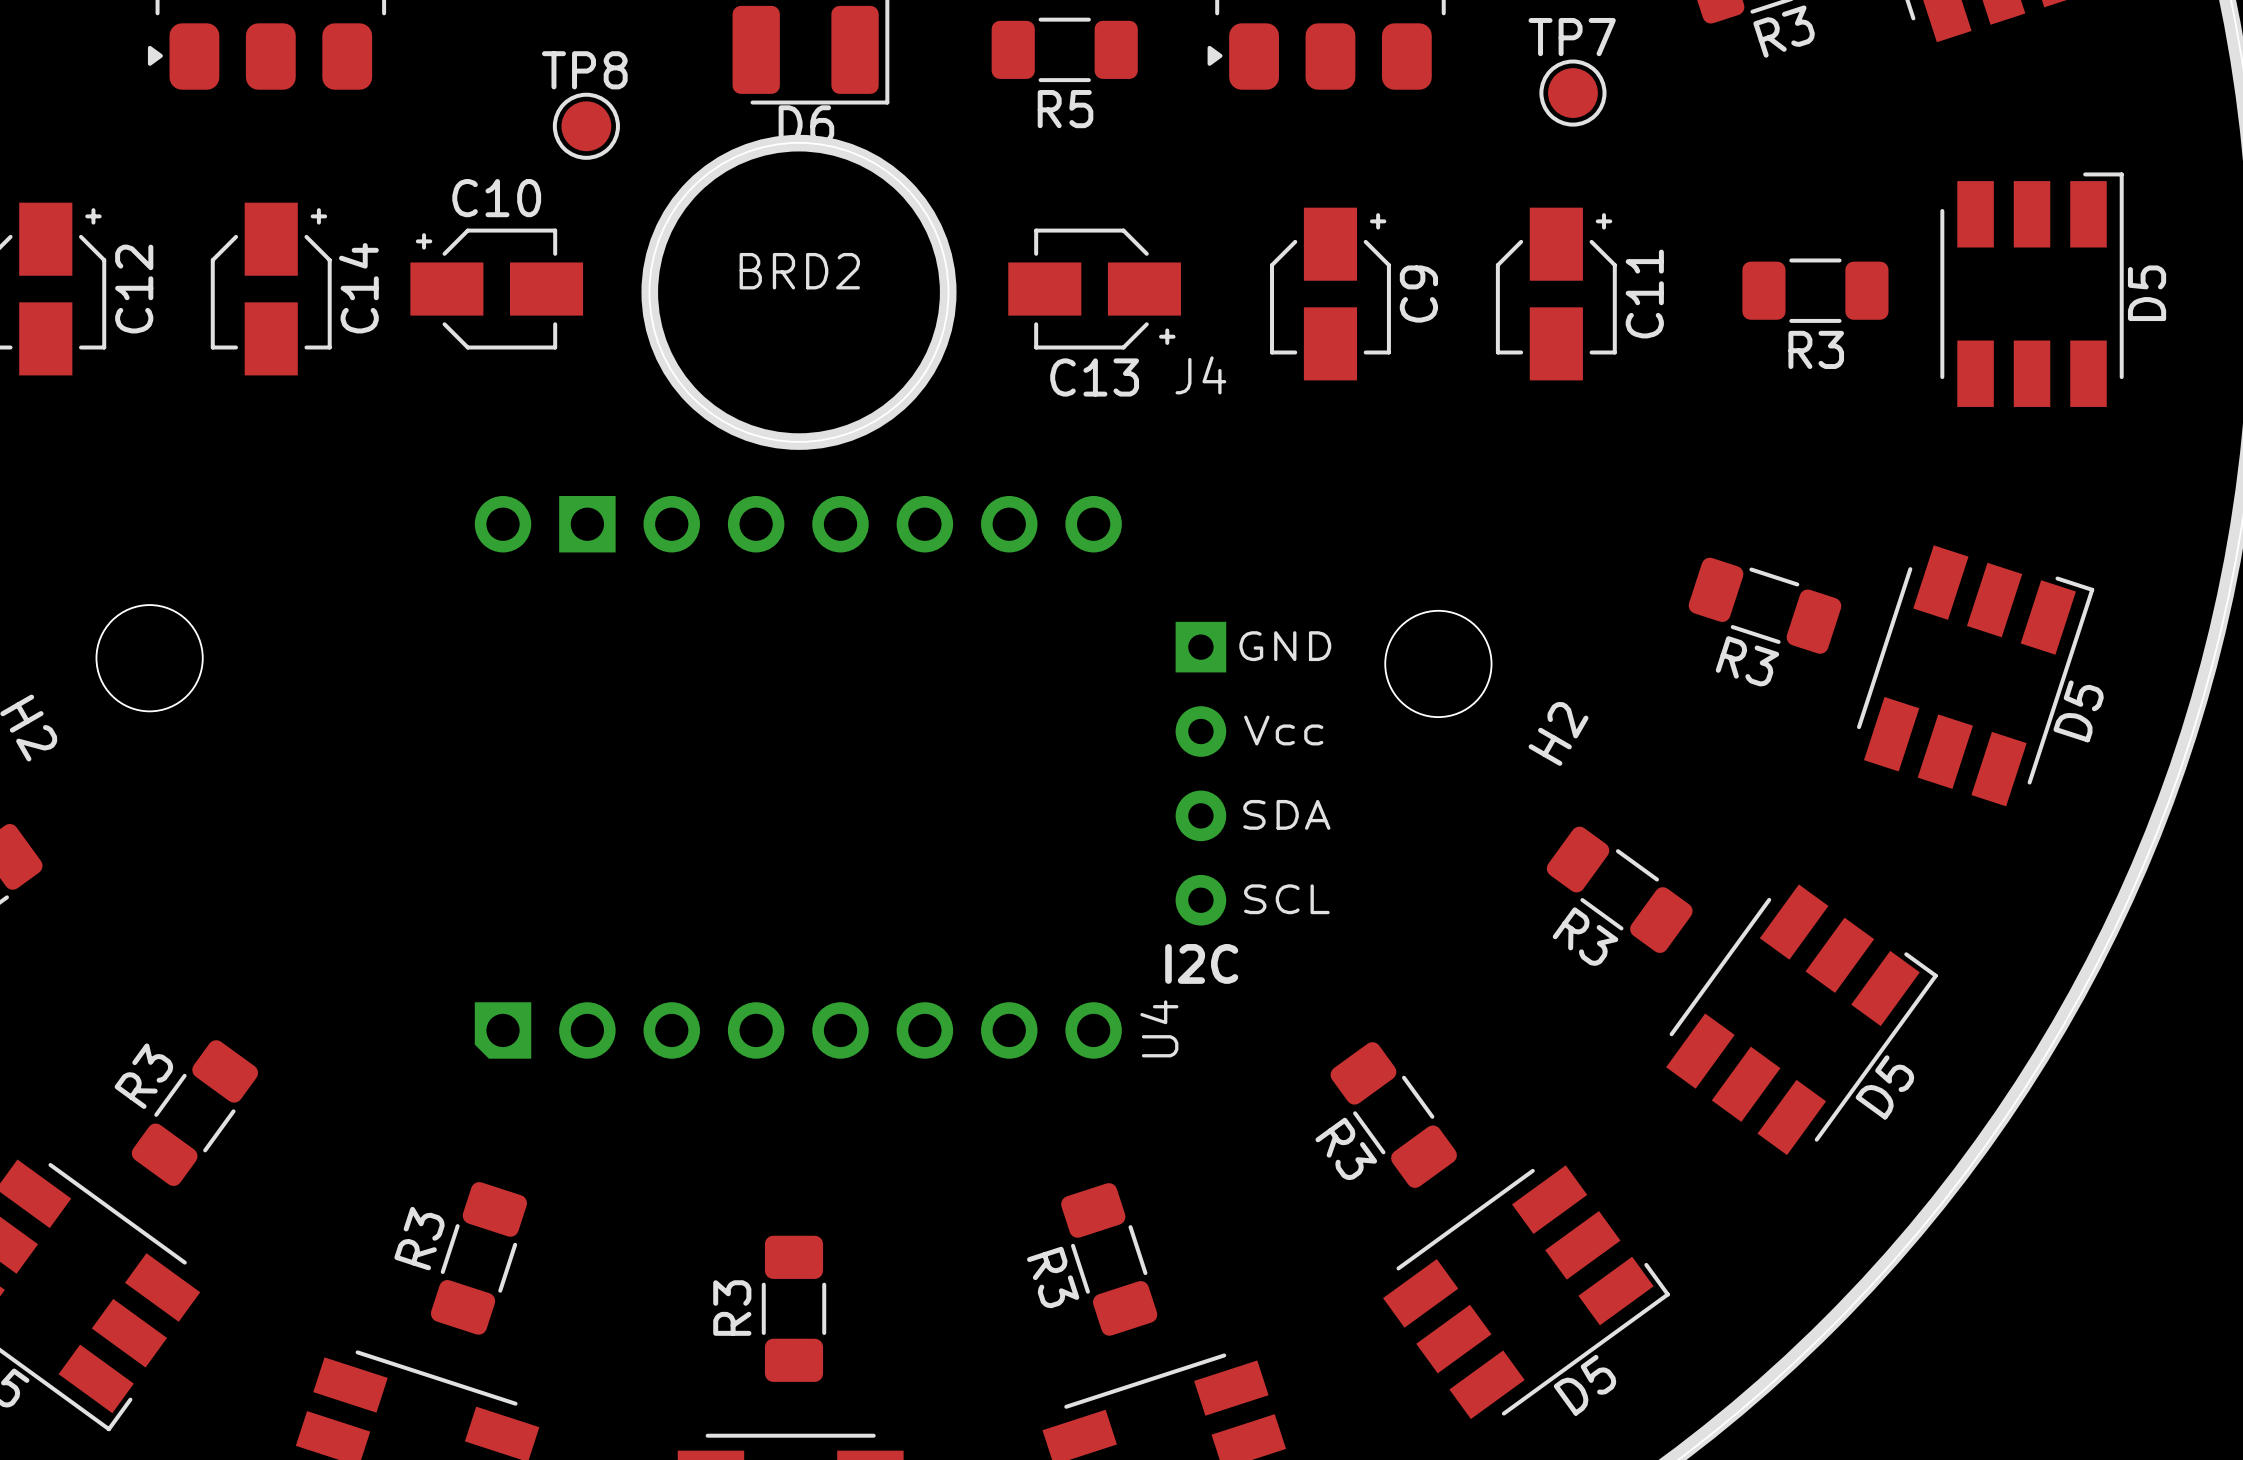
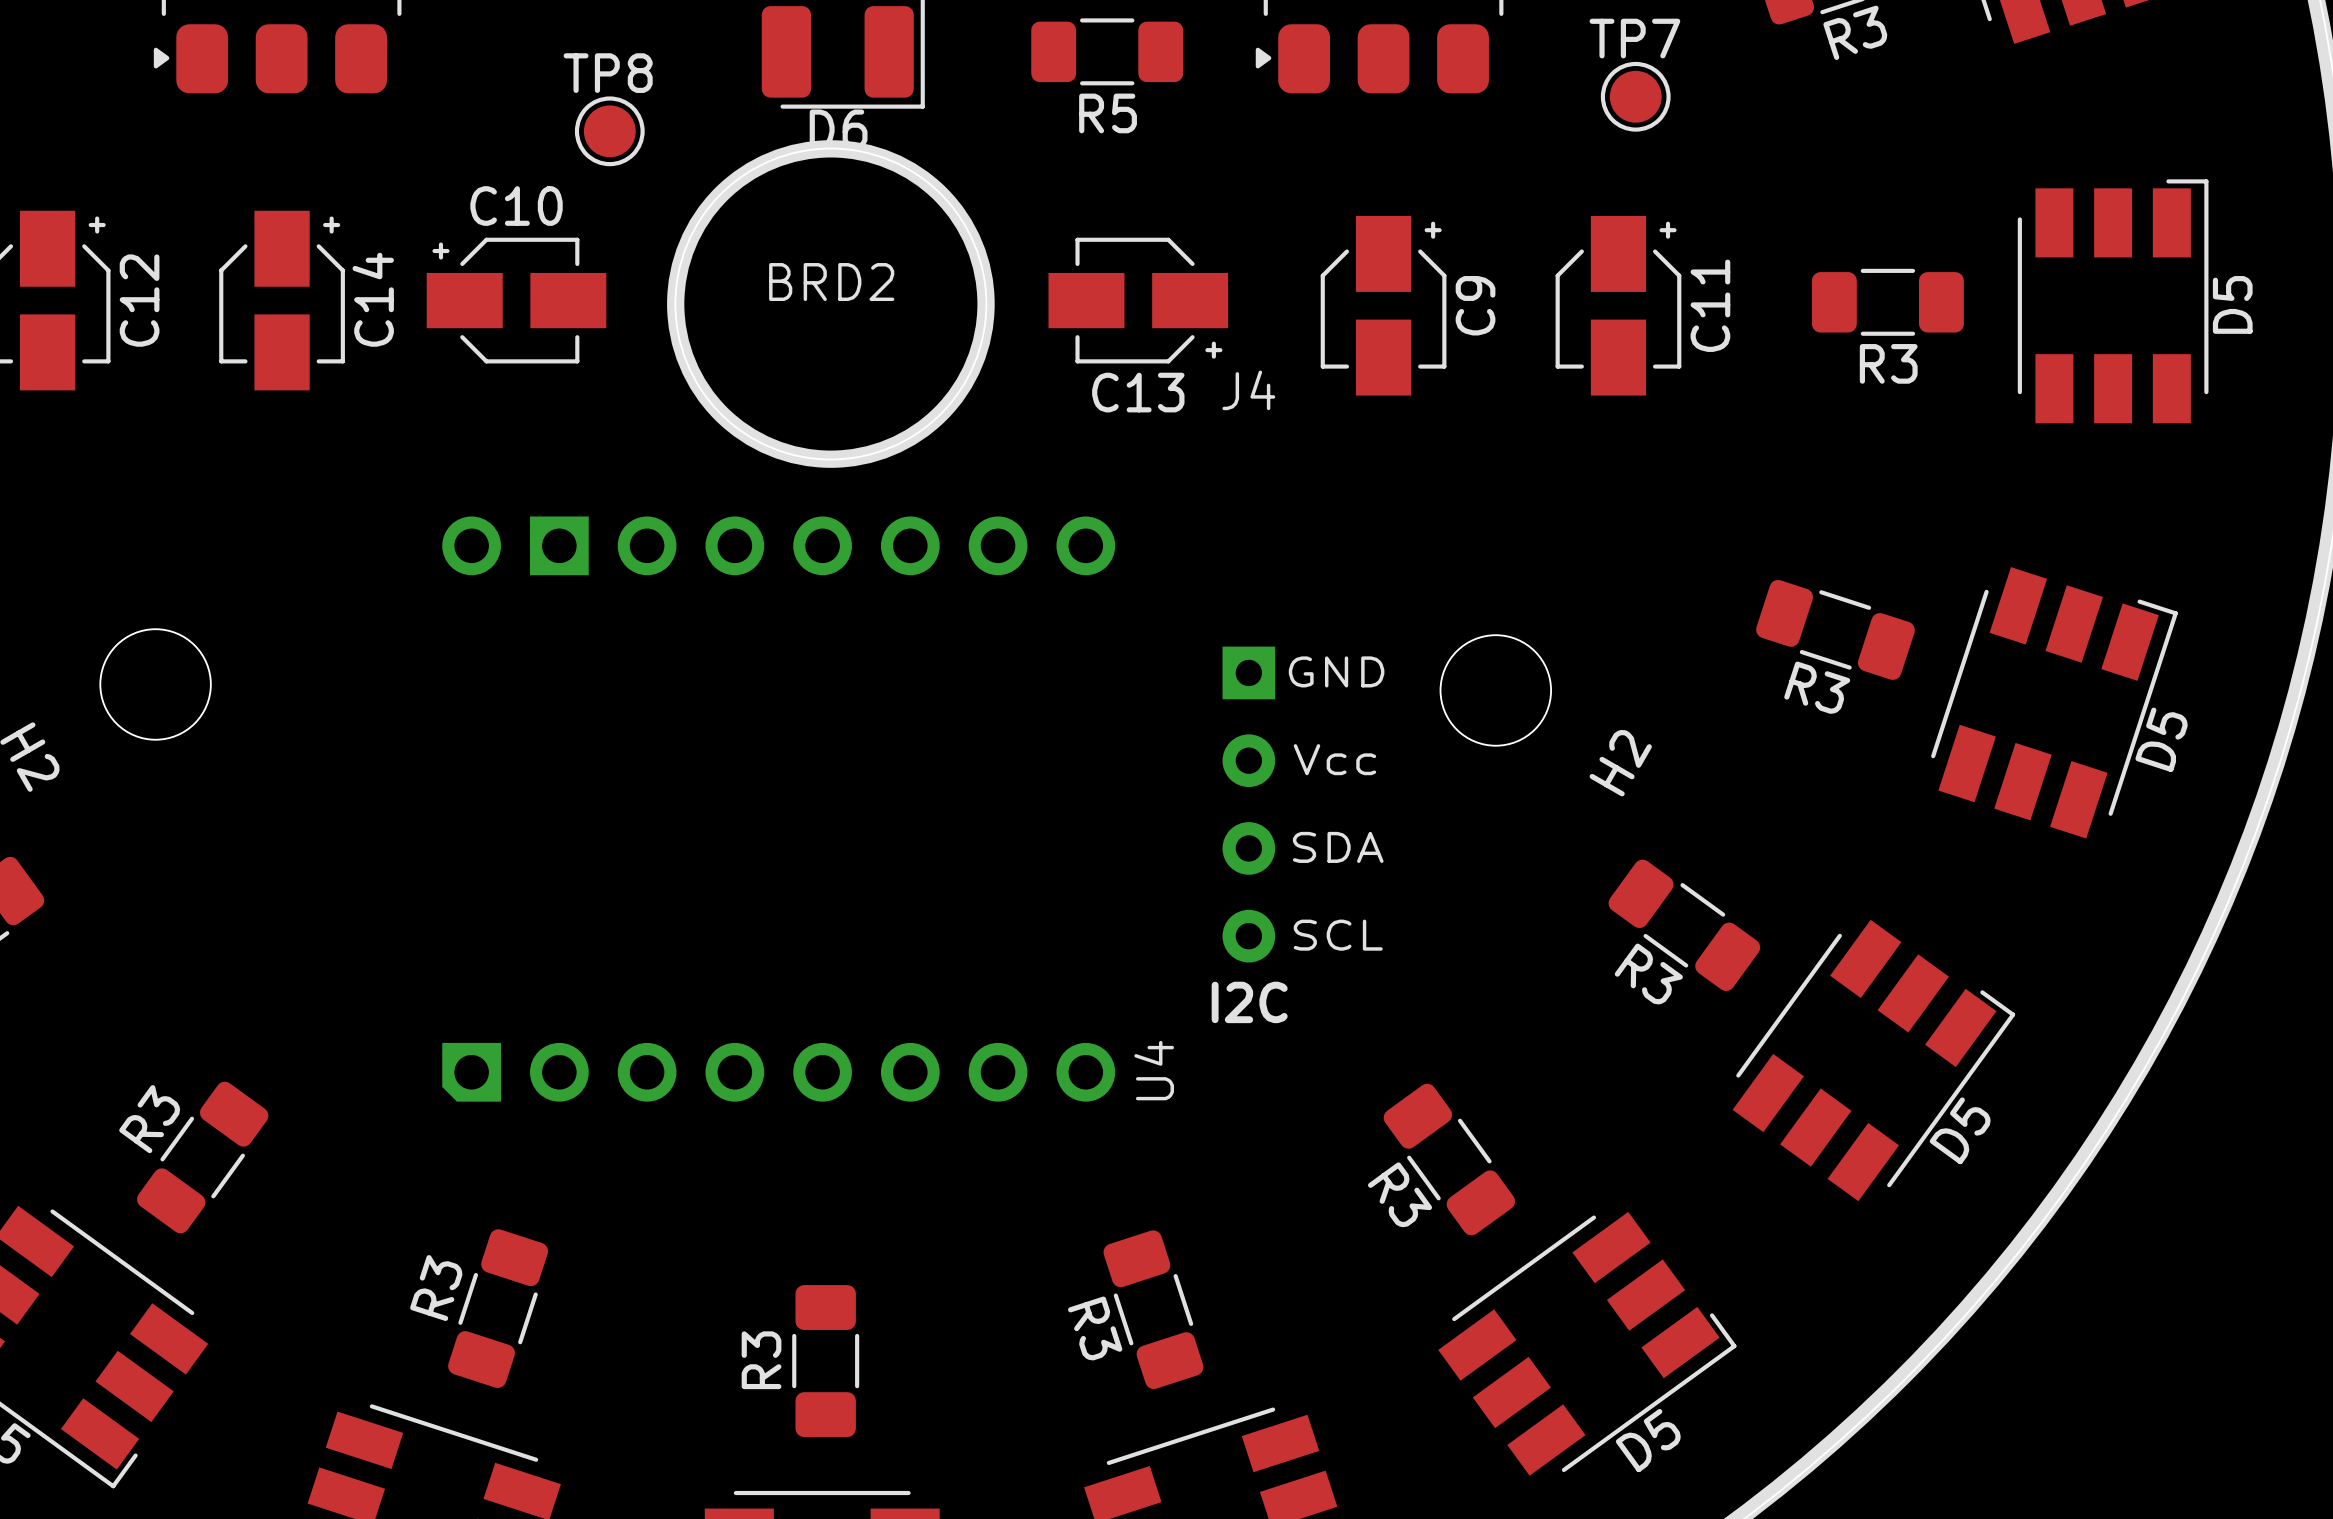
U4 position: (798, 777) -> (778, 809)

